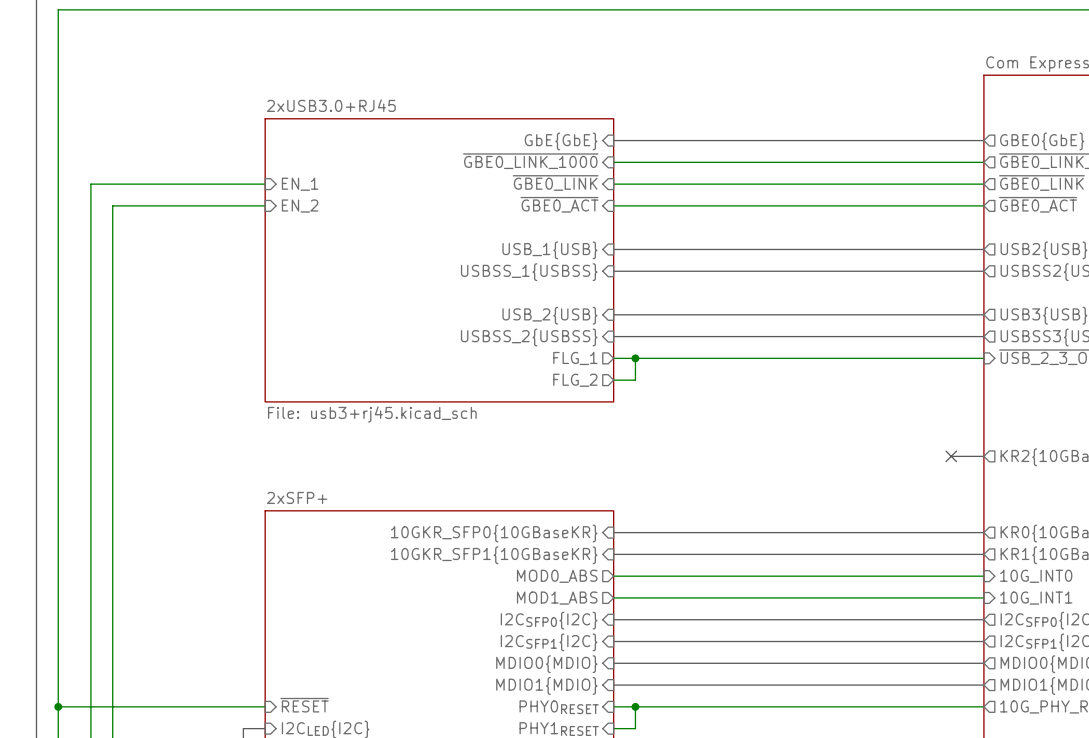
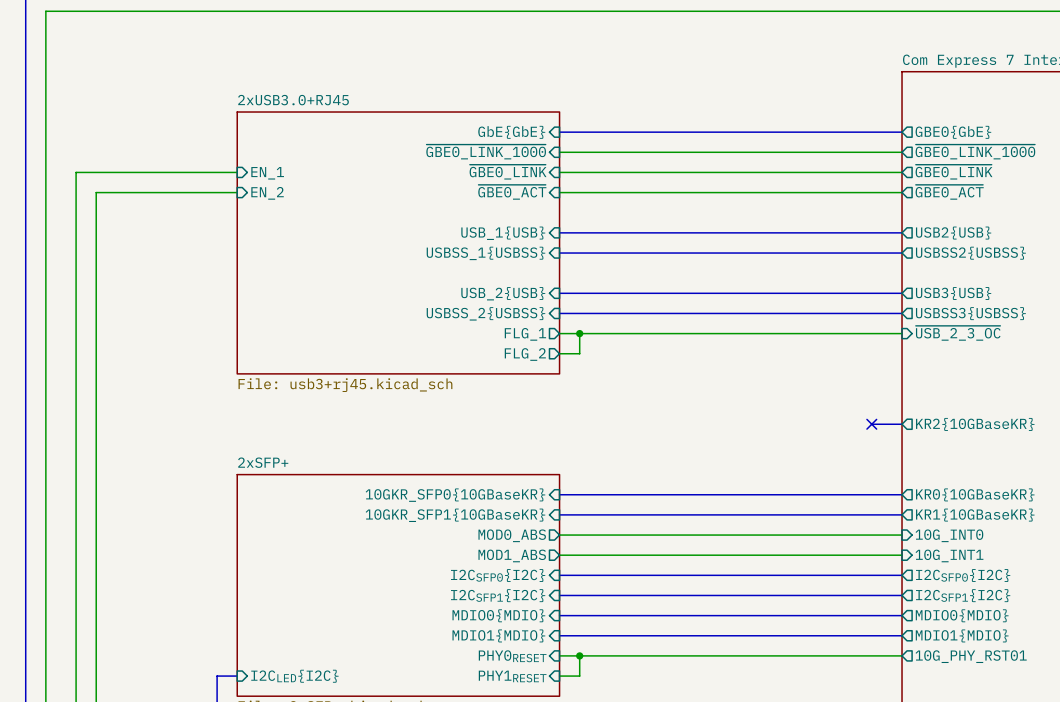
sheet pin: ~{RESET} (304, 705) -> none
wire: (58, 706) (265, 706) -> none
junction: (58, 706) -> none

